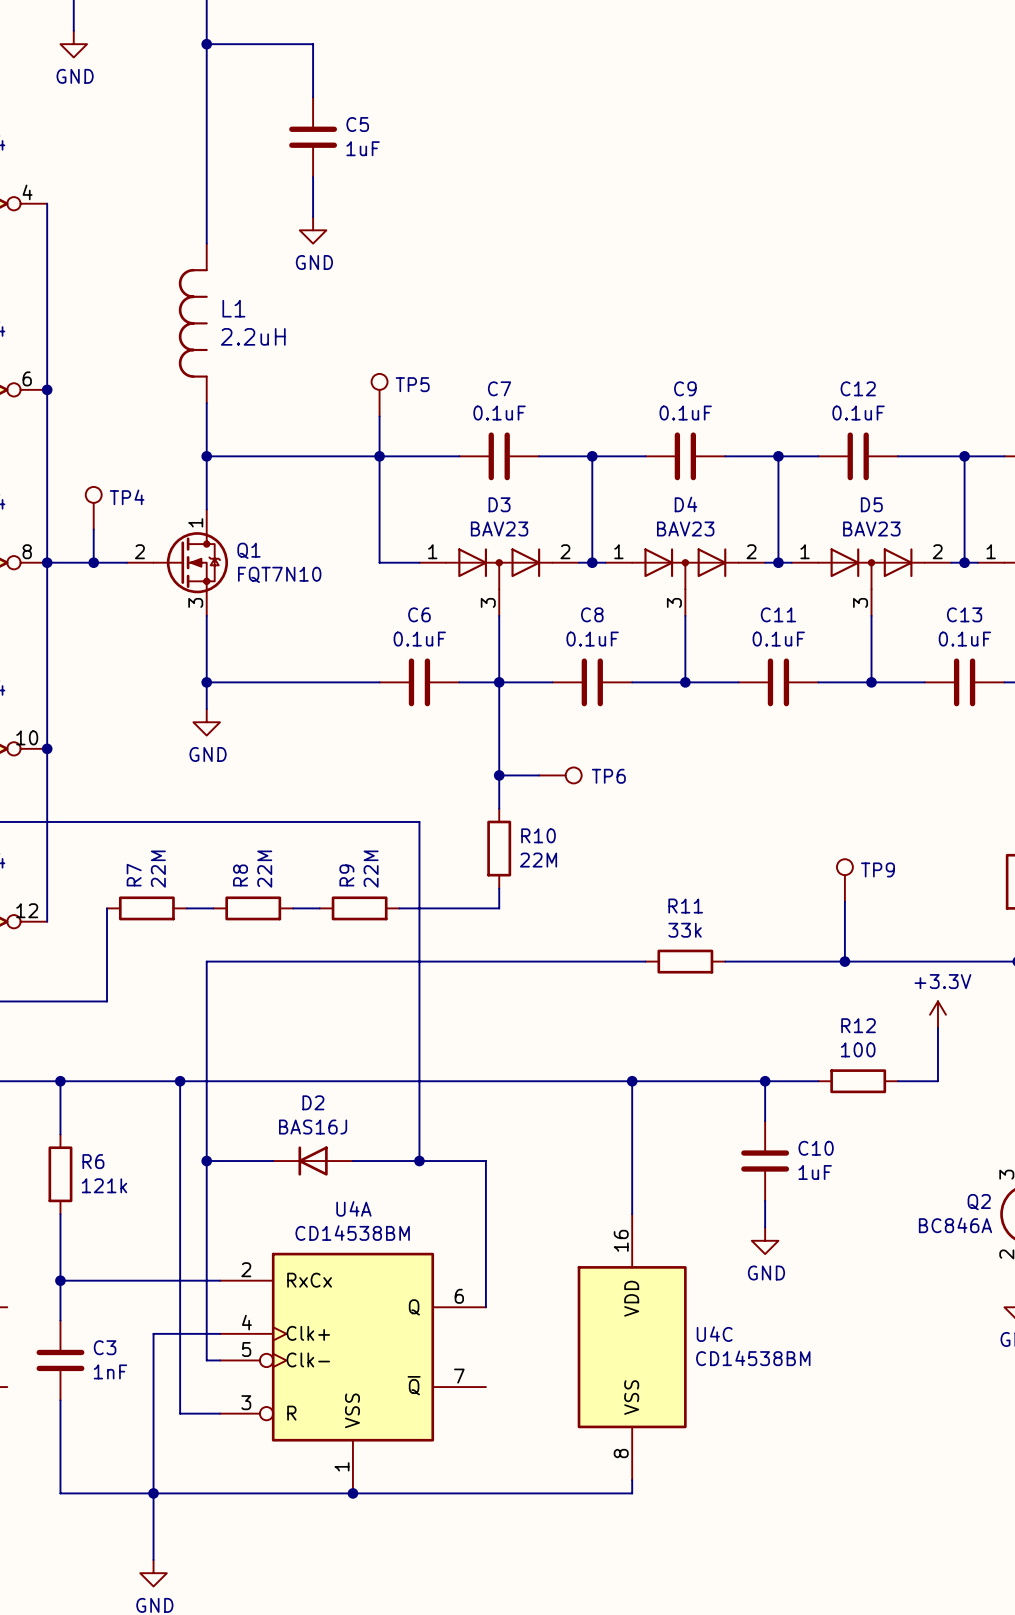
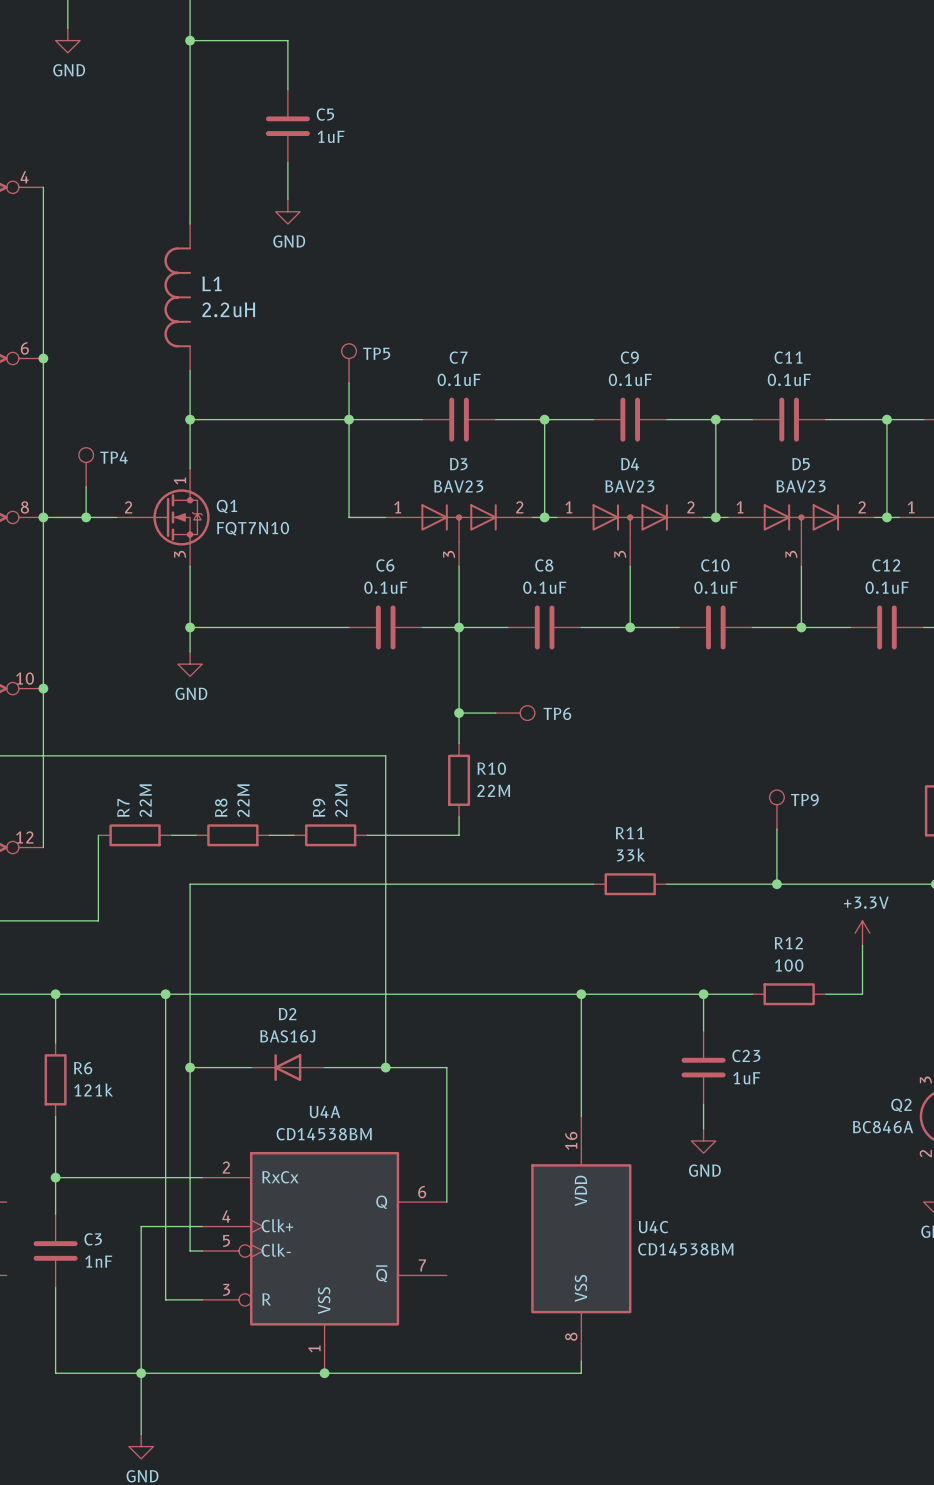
C12 name: C12 (858, 388) -> C11 (788, 357)
C11 name: C11 (778, 614) -> C10 (715, 565)
C13 name: C13 (964, 614) -> C12 (886, 565)
C10 name: C10 (816, 1148) -> C23 (746, 1055)

